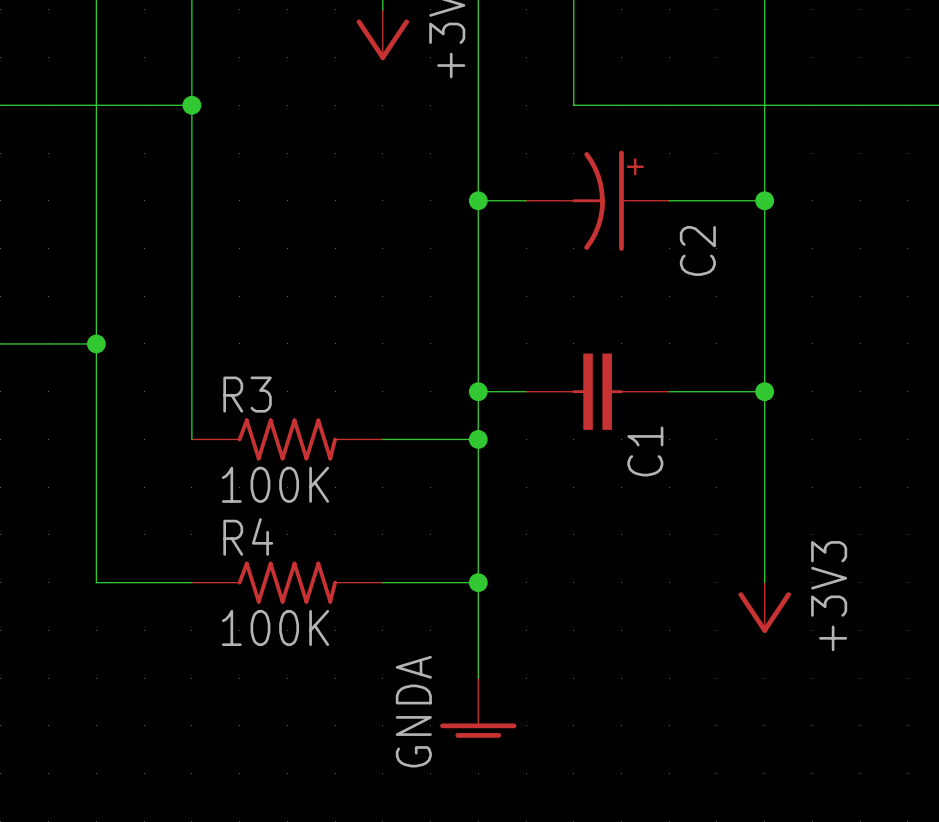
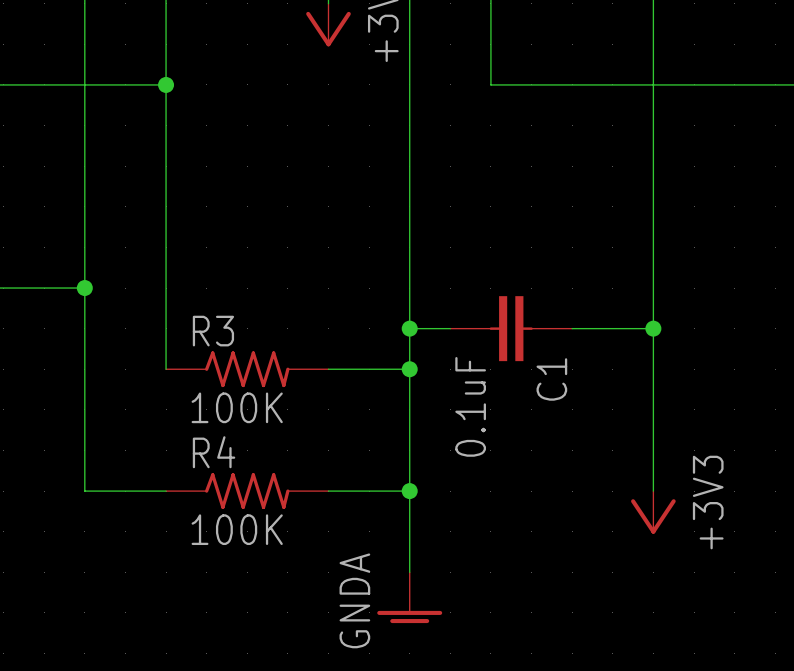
wire: (478, 200) (526, 200) -> none
junction: (478, 200) -> none
C2: (597, 200) -> none
wire: (669, 200) (764, 200) -> none
junction: (764, 200) -> none
C1 value: none -> 0.1uF (470, 406)

